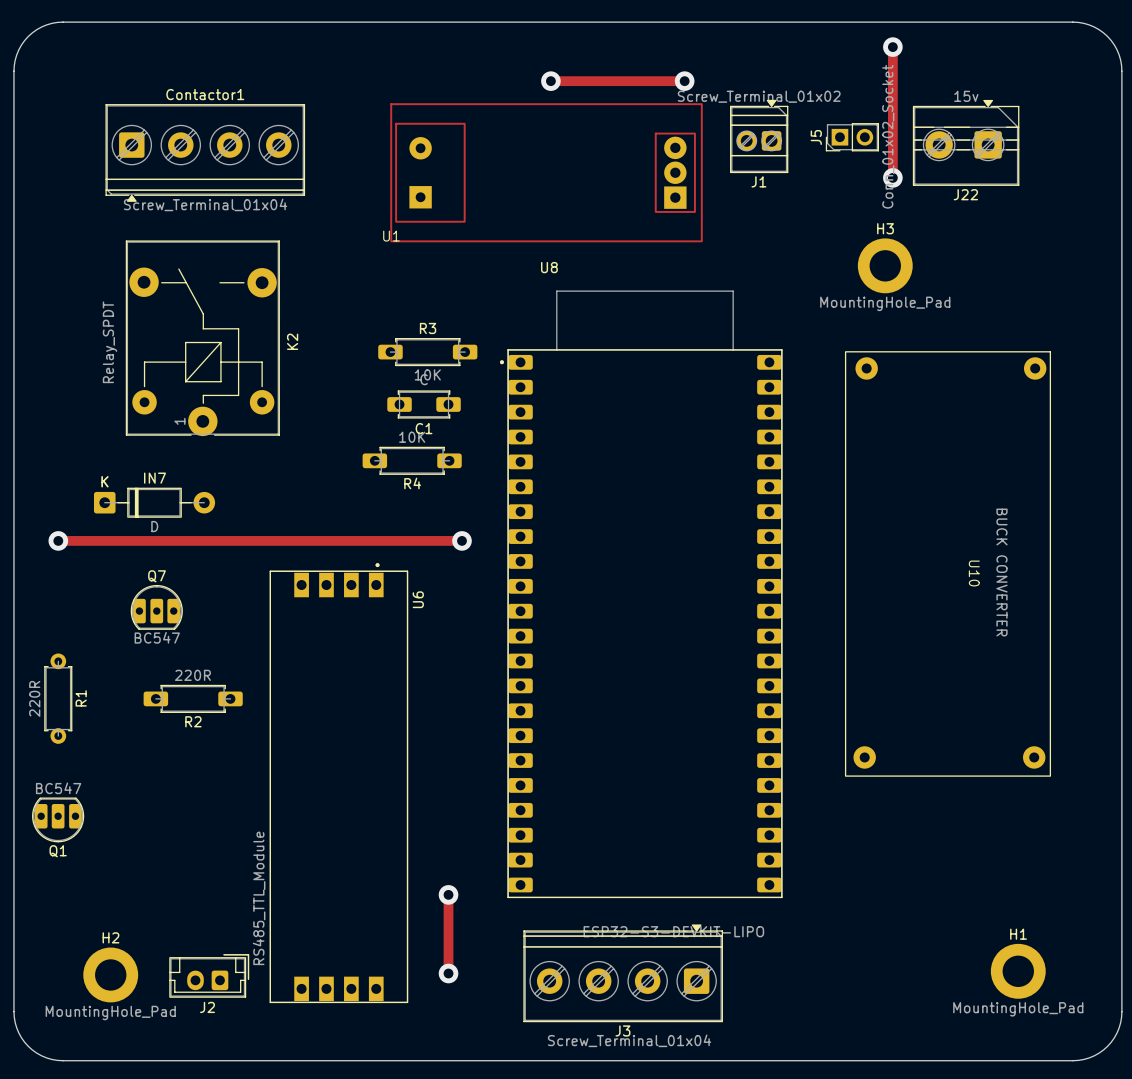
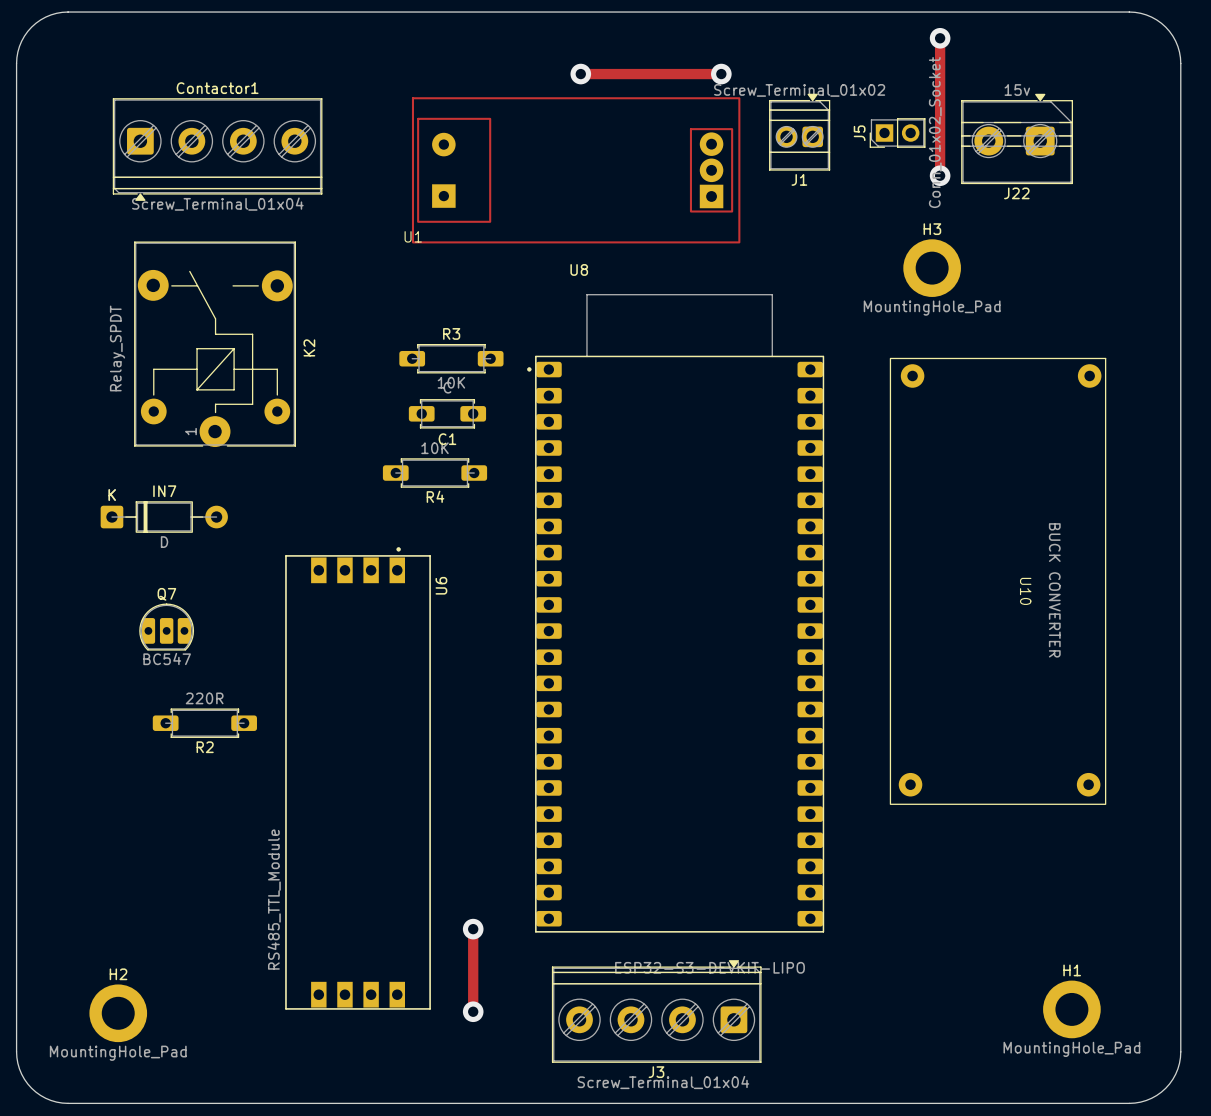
track: (58, 540) (462, 540) -> none
via: (58, 540) -> none
via: (462, 540) -> none
R1: 220R (58, 698) -> none
U6 position: (338, 783) -> (358, 778)
Q1: BC547 (58, 819) -> none
J2: (209, 975) -> none

